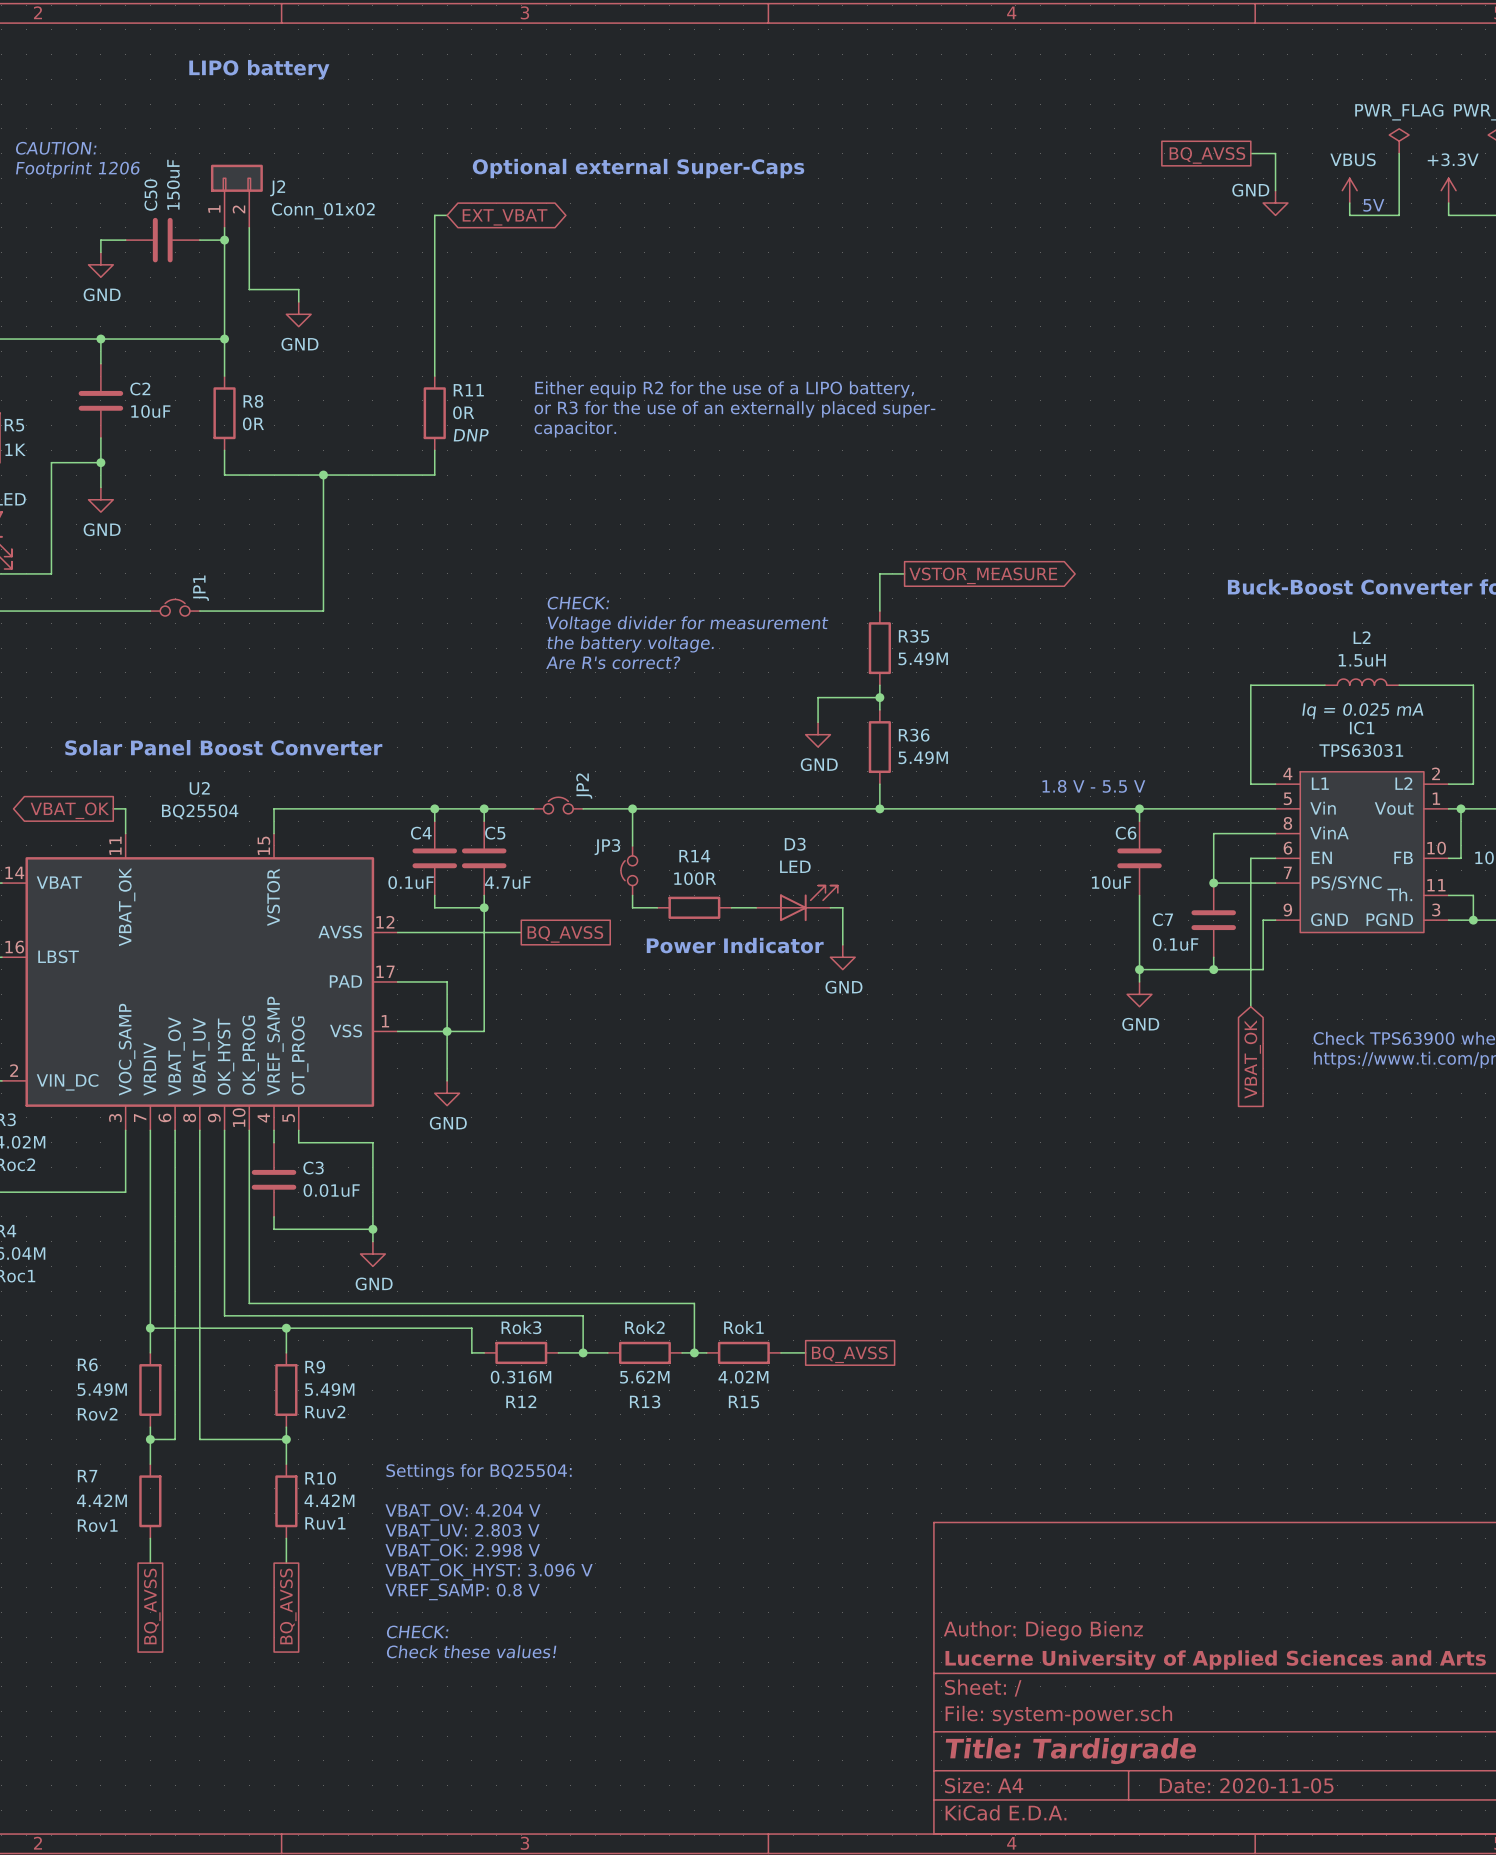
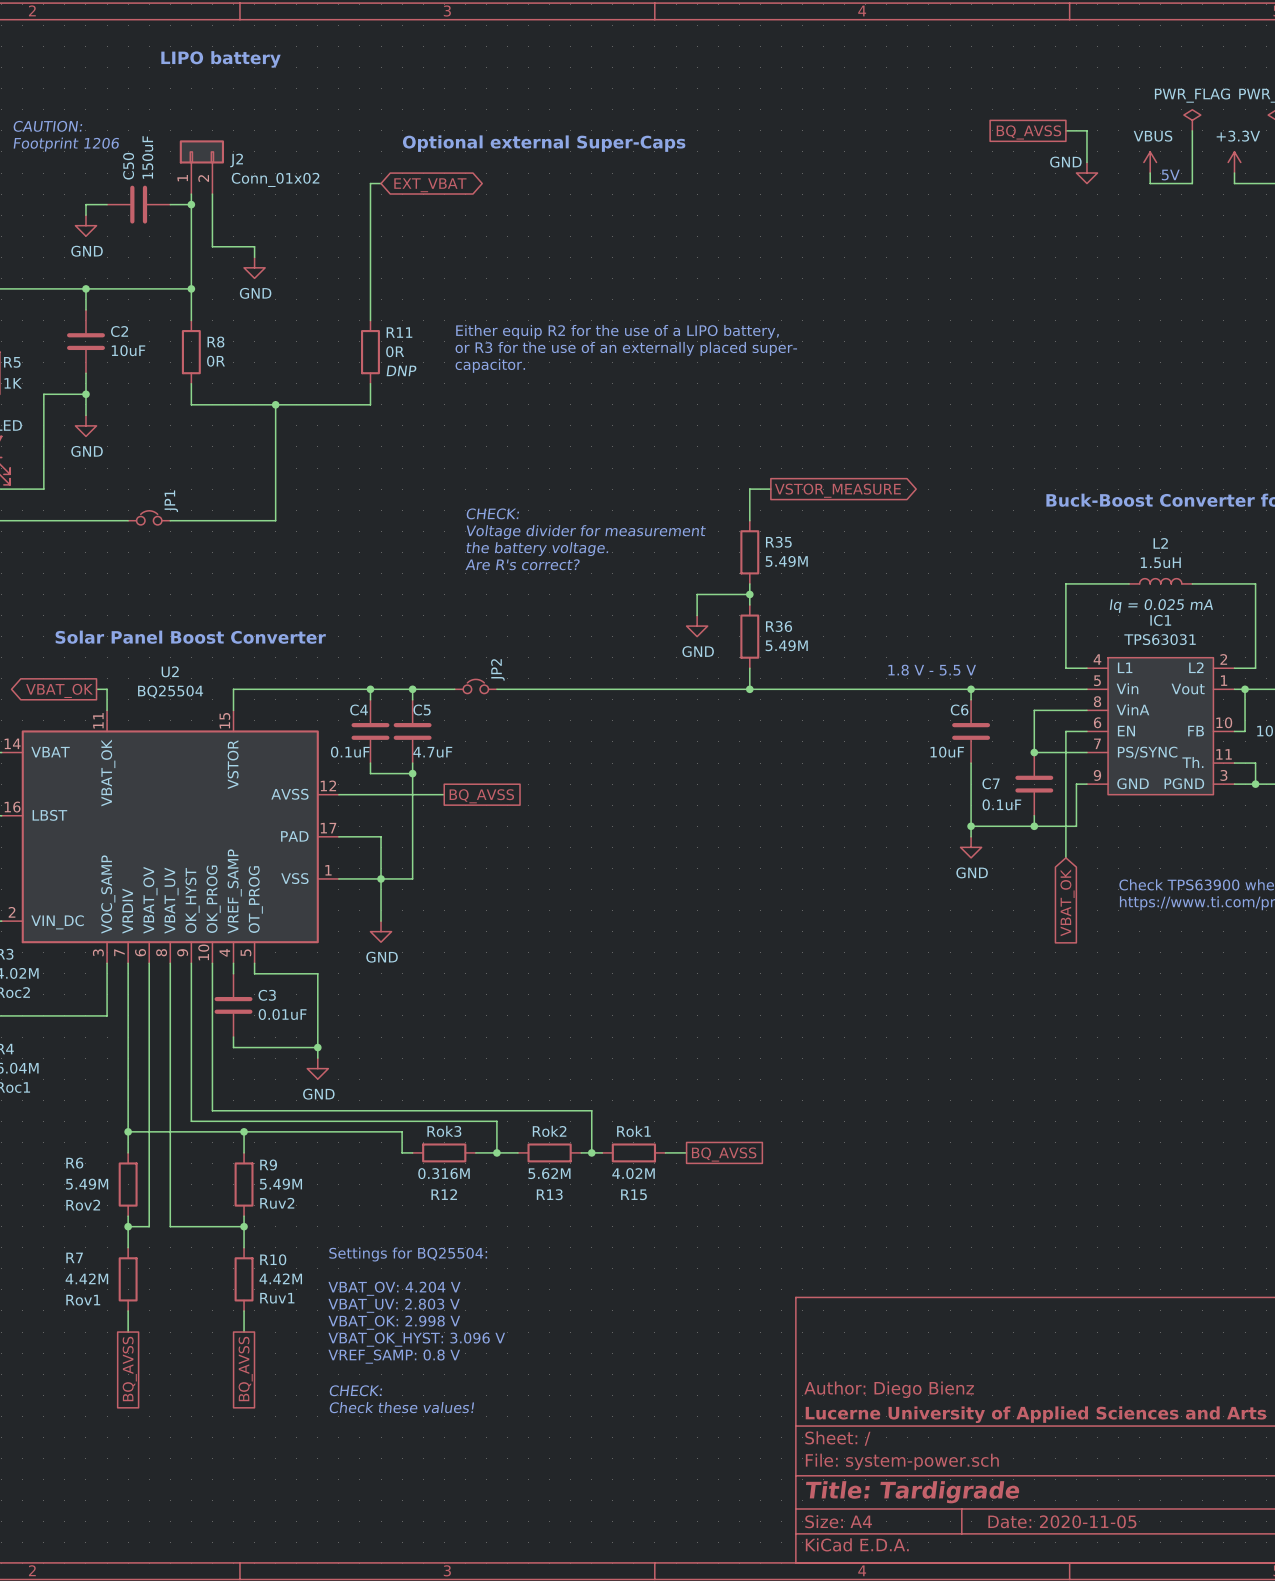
wire: (632, 808) (632, 845) -> none
junction: (632, 808) -> none
JP3: (629, 870) -> none
wire: (632, 895) (632, 907) (657, 907) -> none
D3: LED (797, 903) -> none
R14: 100R (694, 907) -> none
wire: (731, 907) (756, 907) -> none
wire: (830, 907) (842, 907) (842, 944) -> none
text: Power Indicator (735, 945) -> none
power symbol: GND (842, 957) -> none

